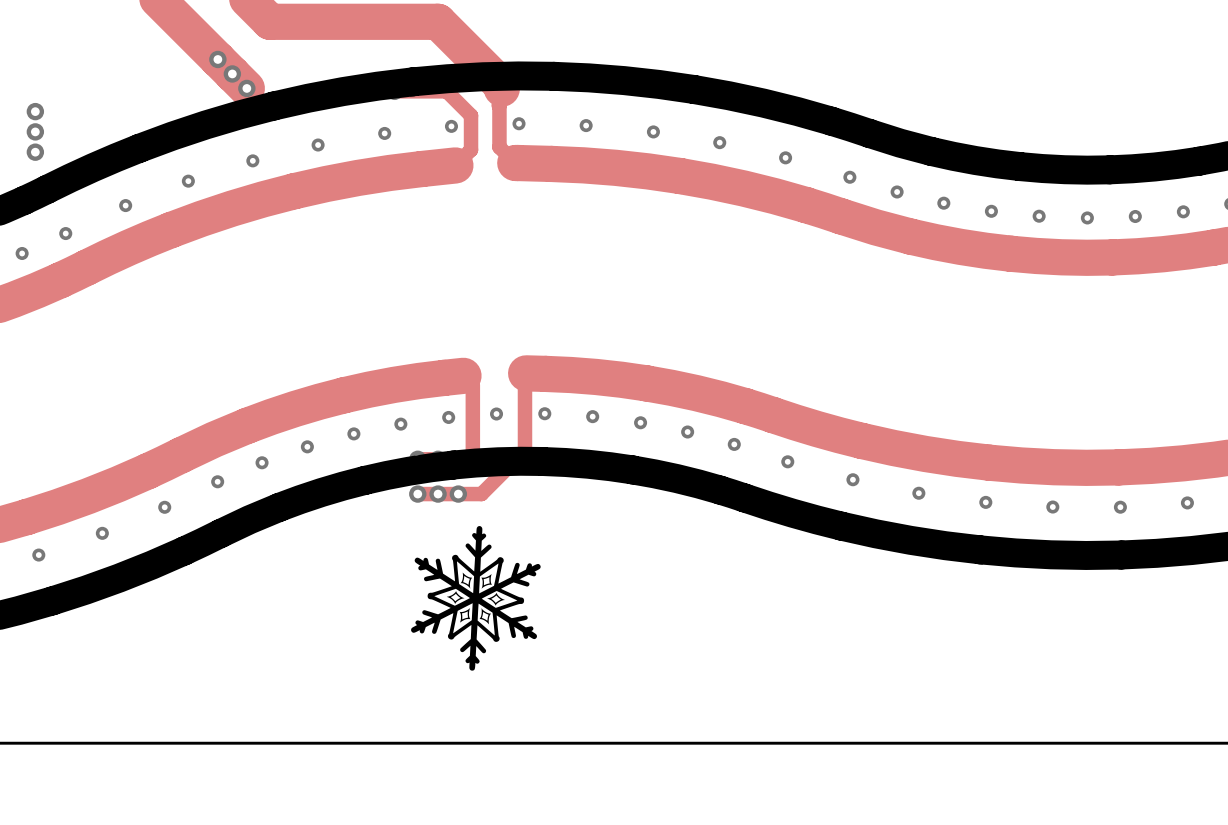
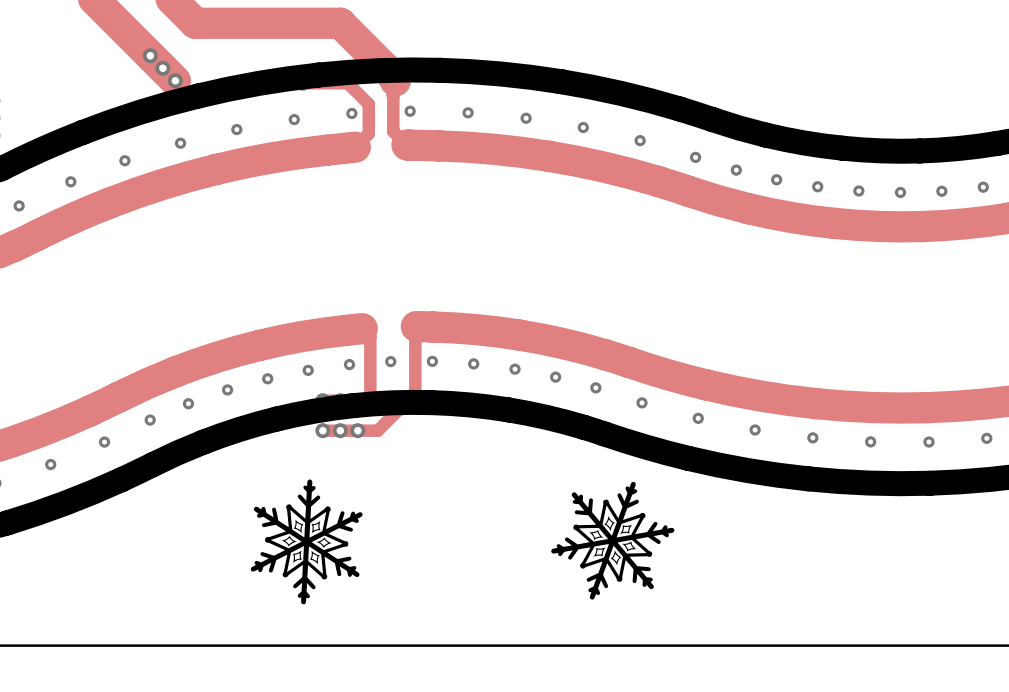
drawing: none -> [551, 481, 675, 600]
drawing position: (475, 598) -> (306, 541)

